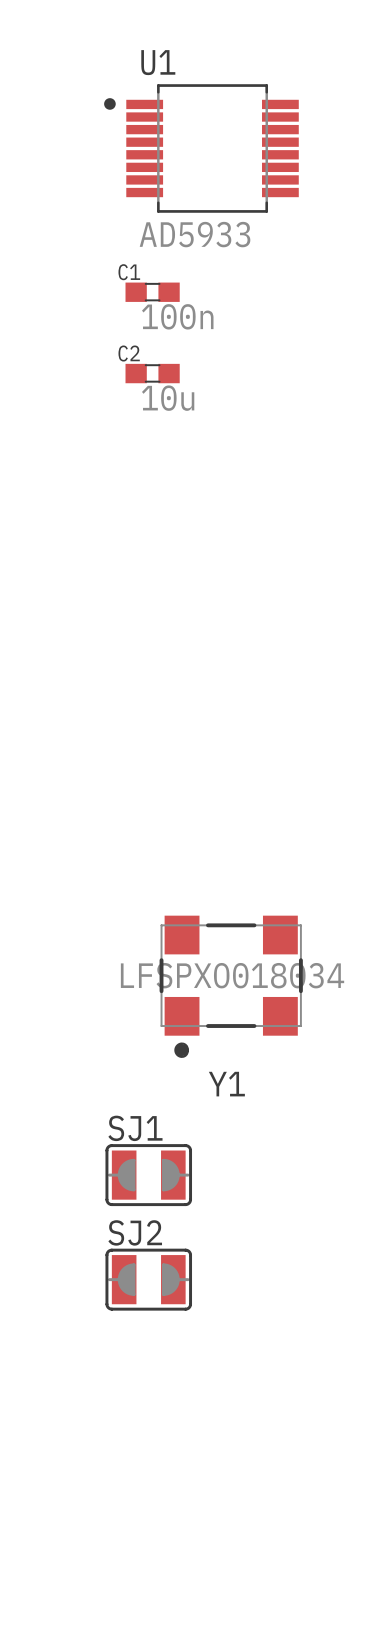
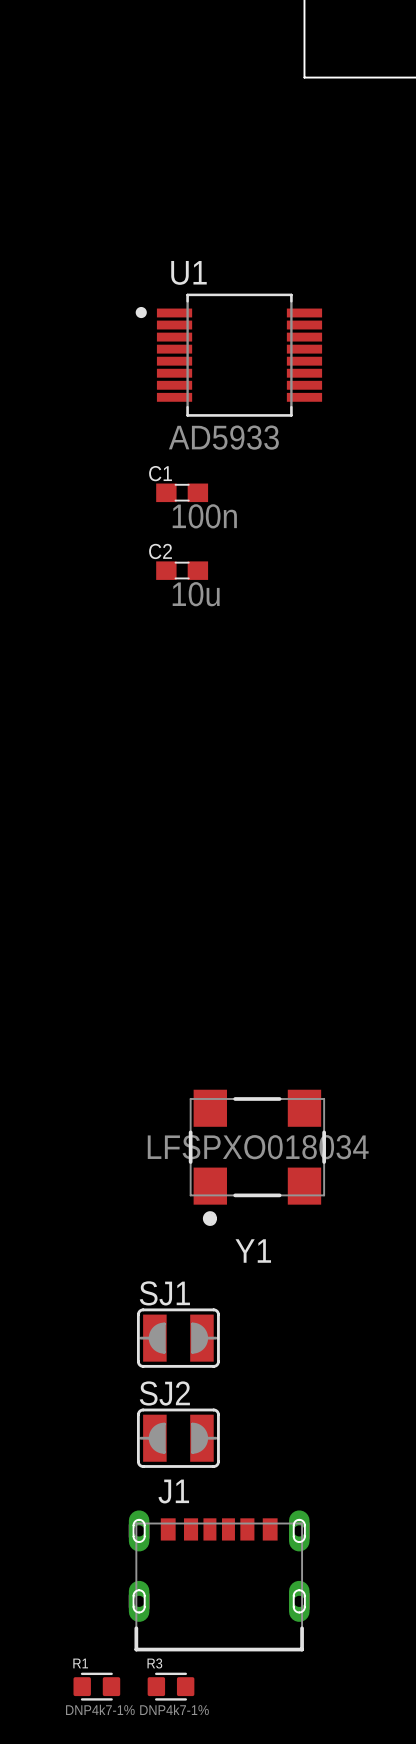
J1: none -> (219, 1580)
R1: none -> DNP4k7-1% (96, 1686)
R3: none -> DNP4k7-1% (171, 1686)

